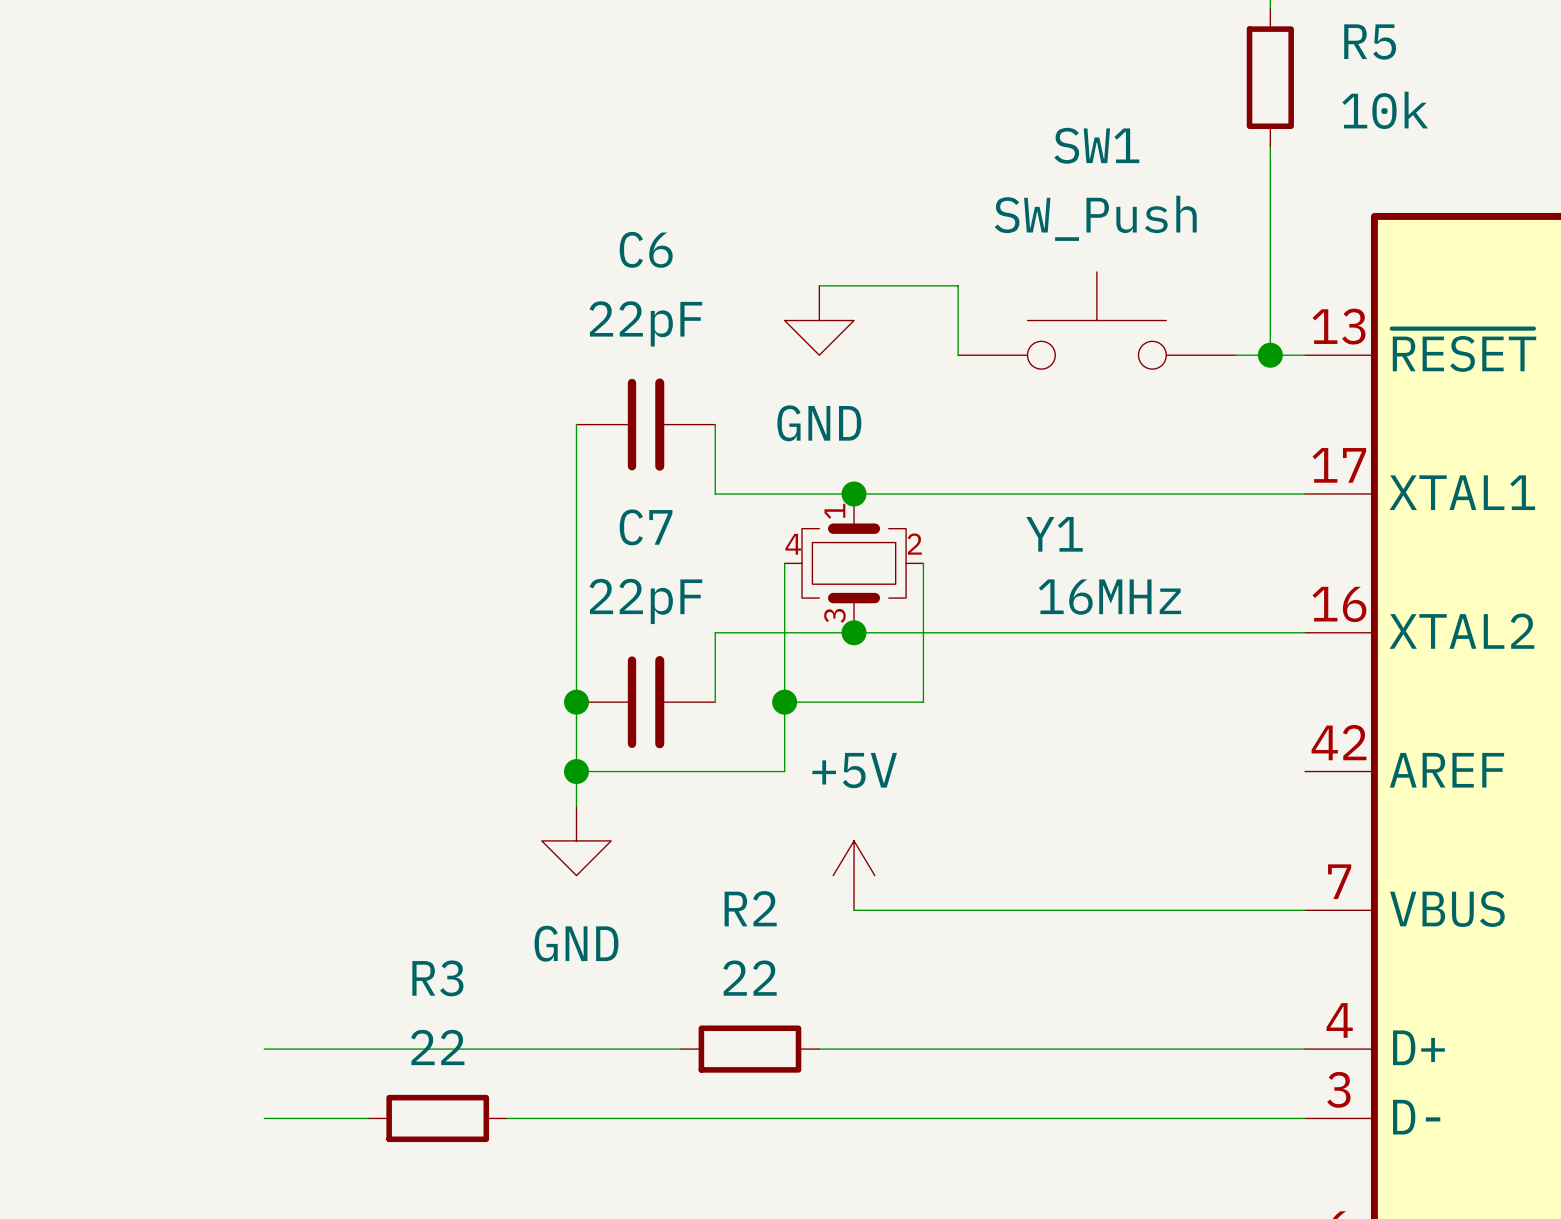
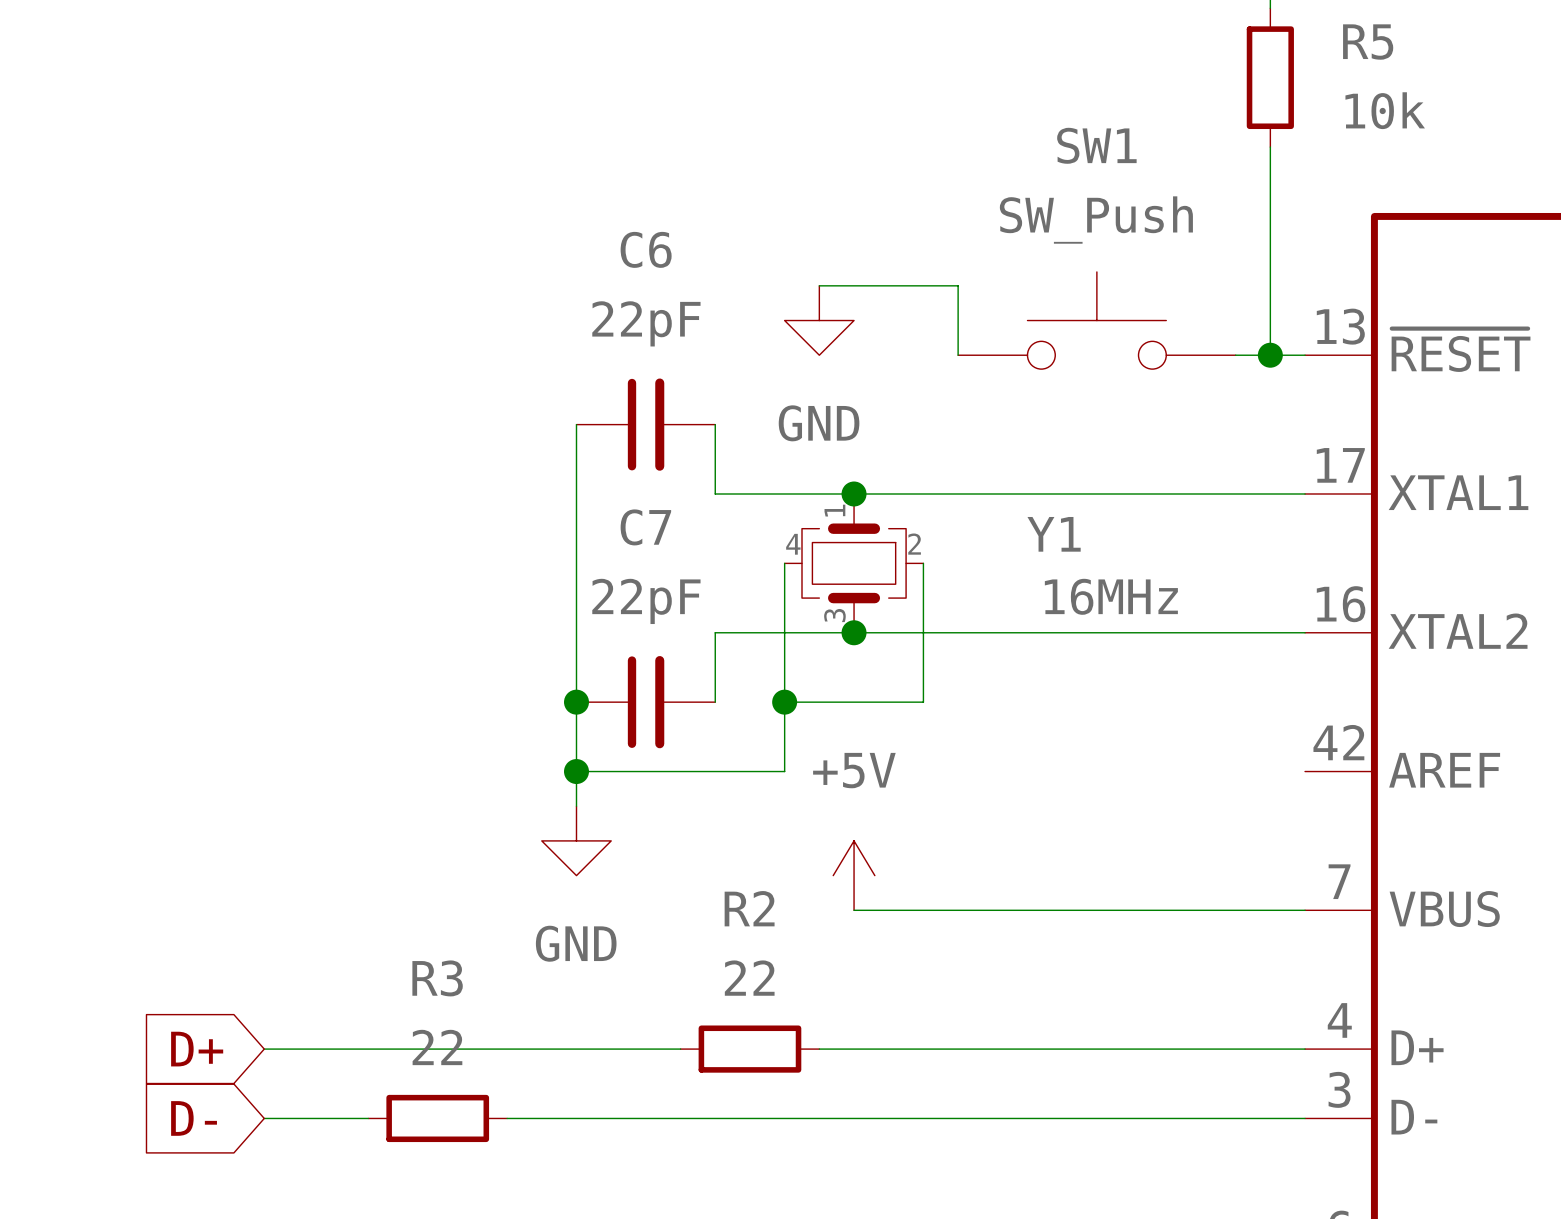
global label: none -> D+ (197, 1049)
global label: none -> D- (194, 1118)

